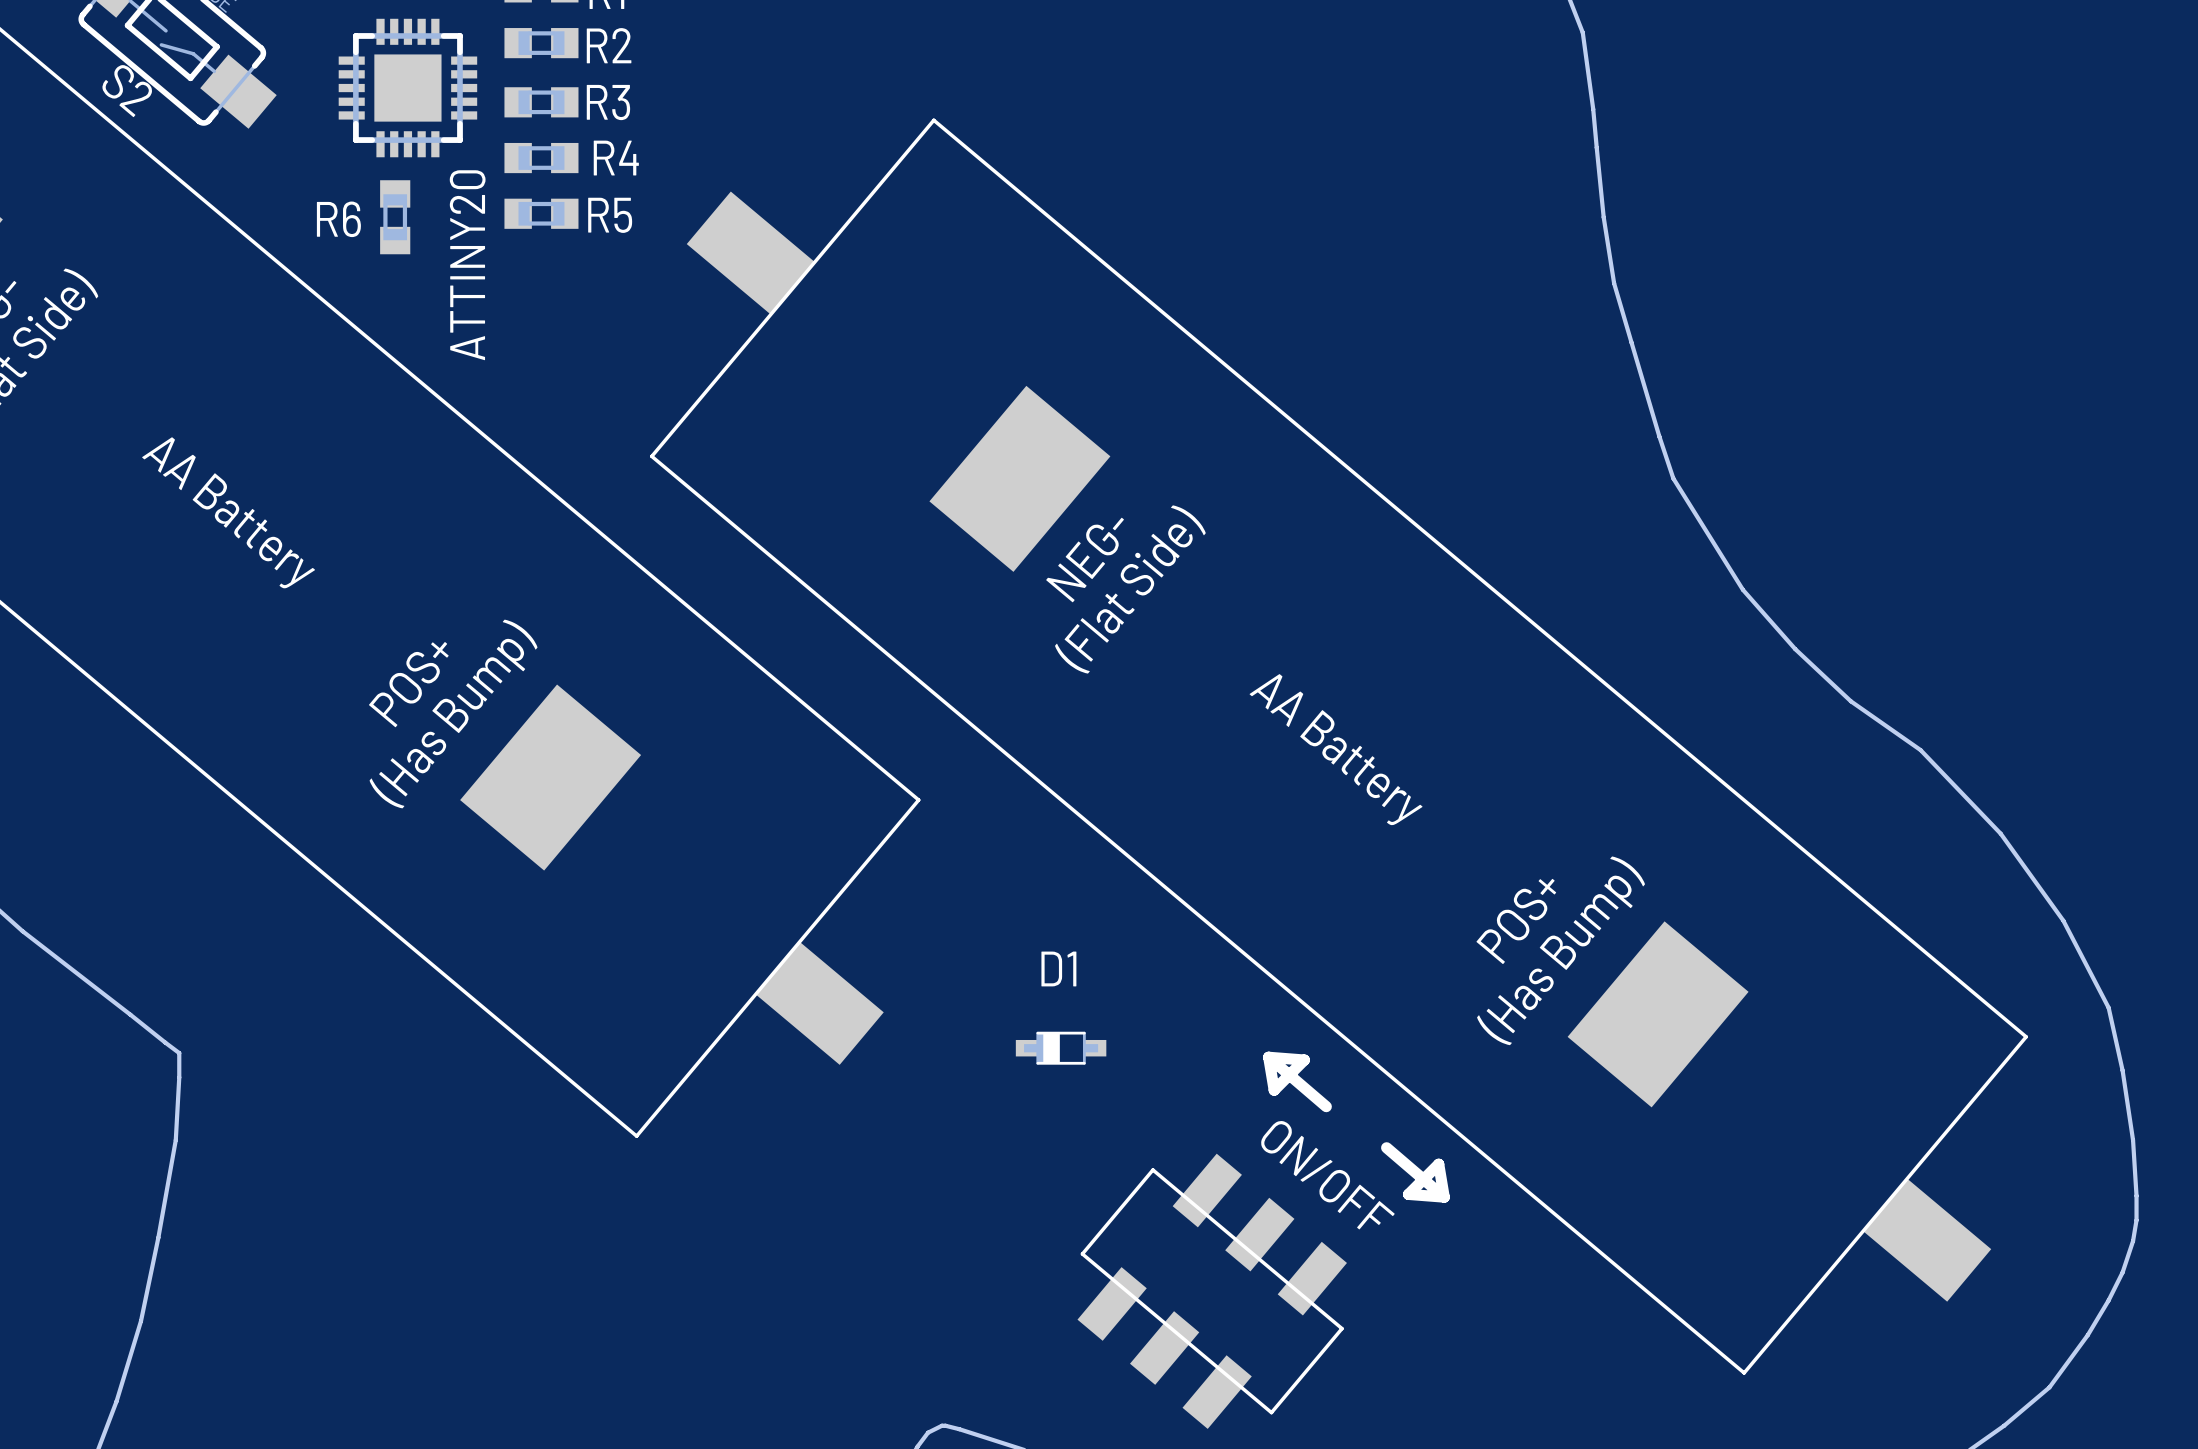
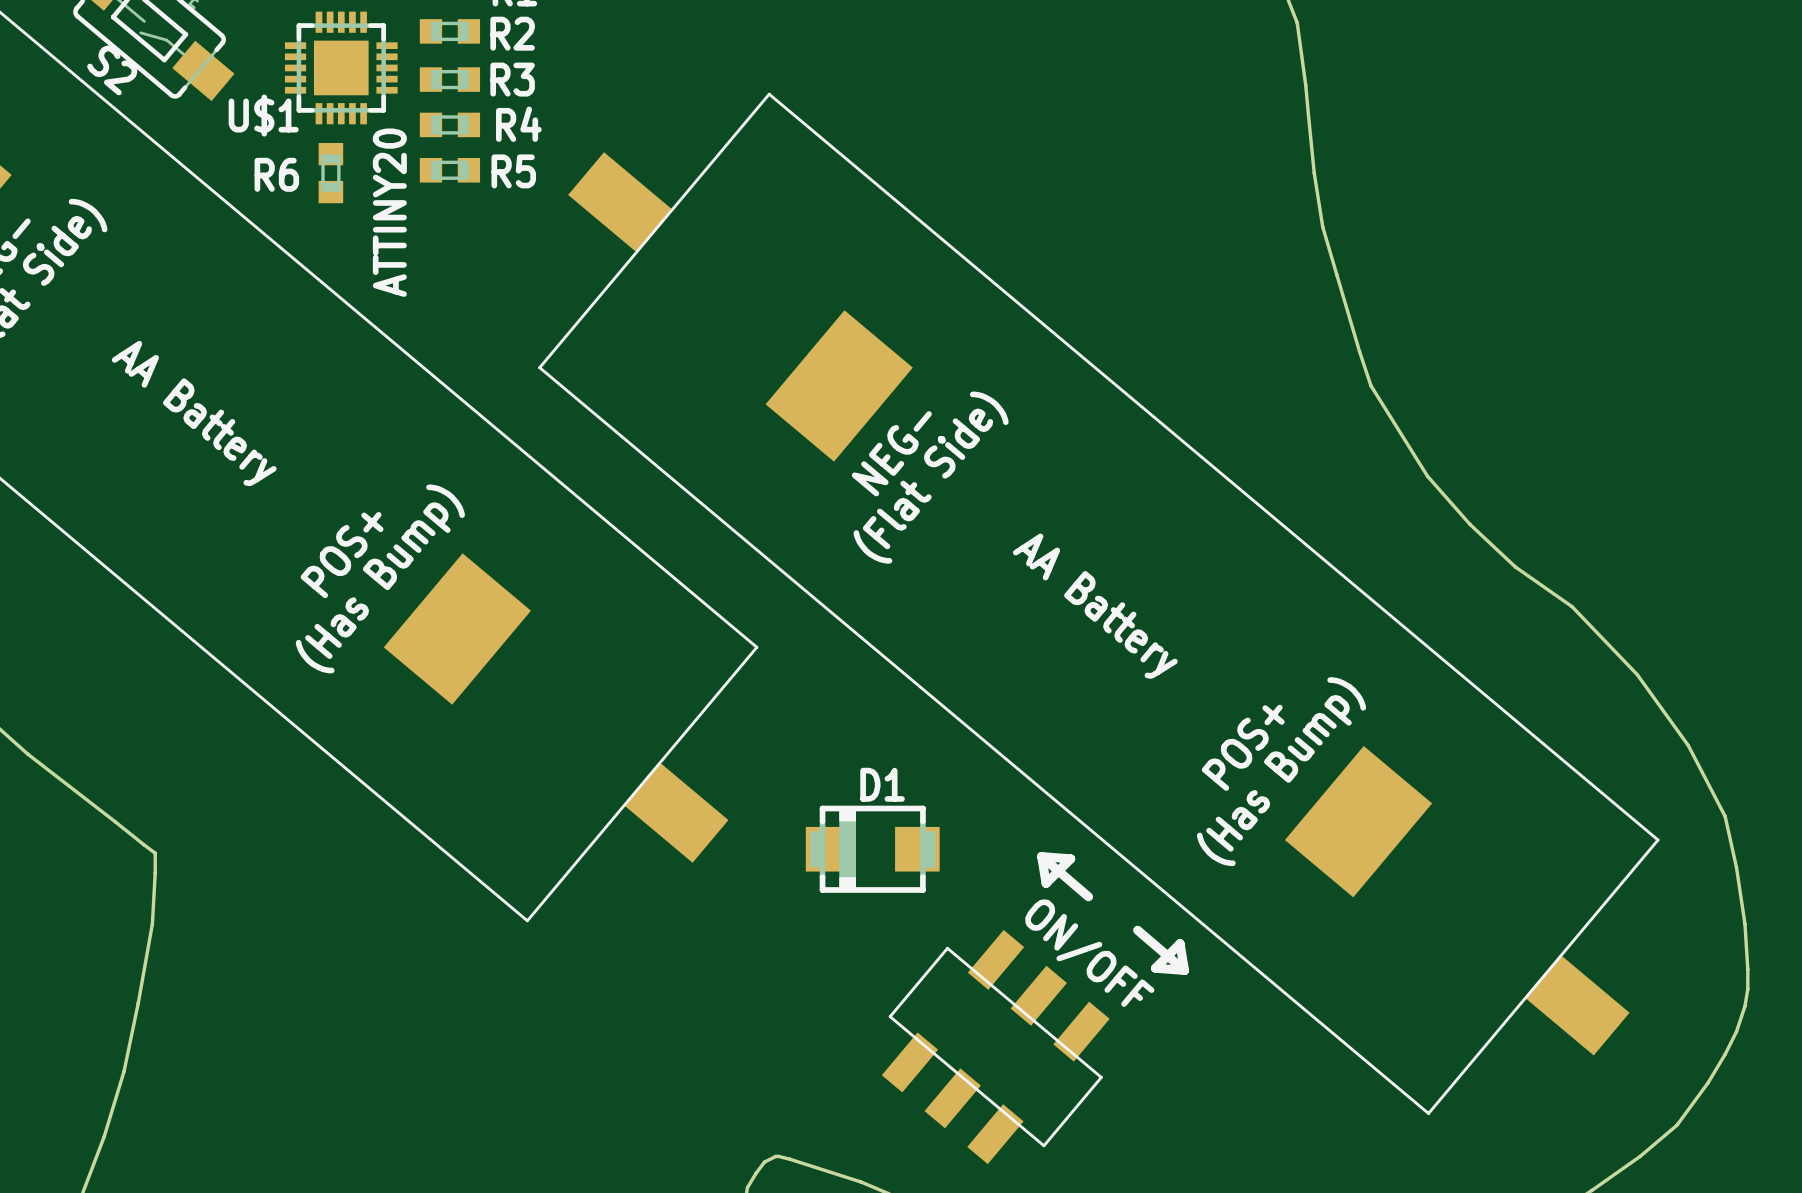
U$1 name: none -> U$1 (263, 115)
D1 footprint: [1015, 1031, 1107, 1065] -> [805, 805, 940, 893]
ON/OFF footprint: [1077, 1153, 1347, 1429] -> [881, 929, 1110, 1165]

